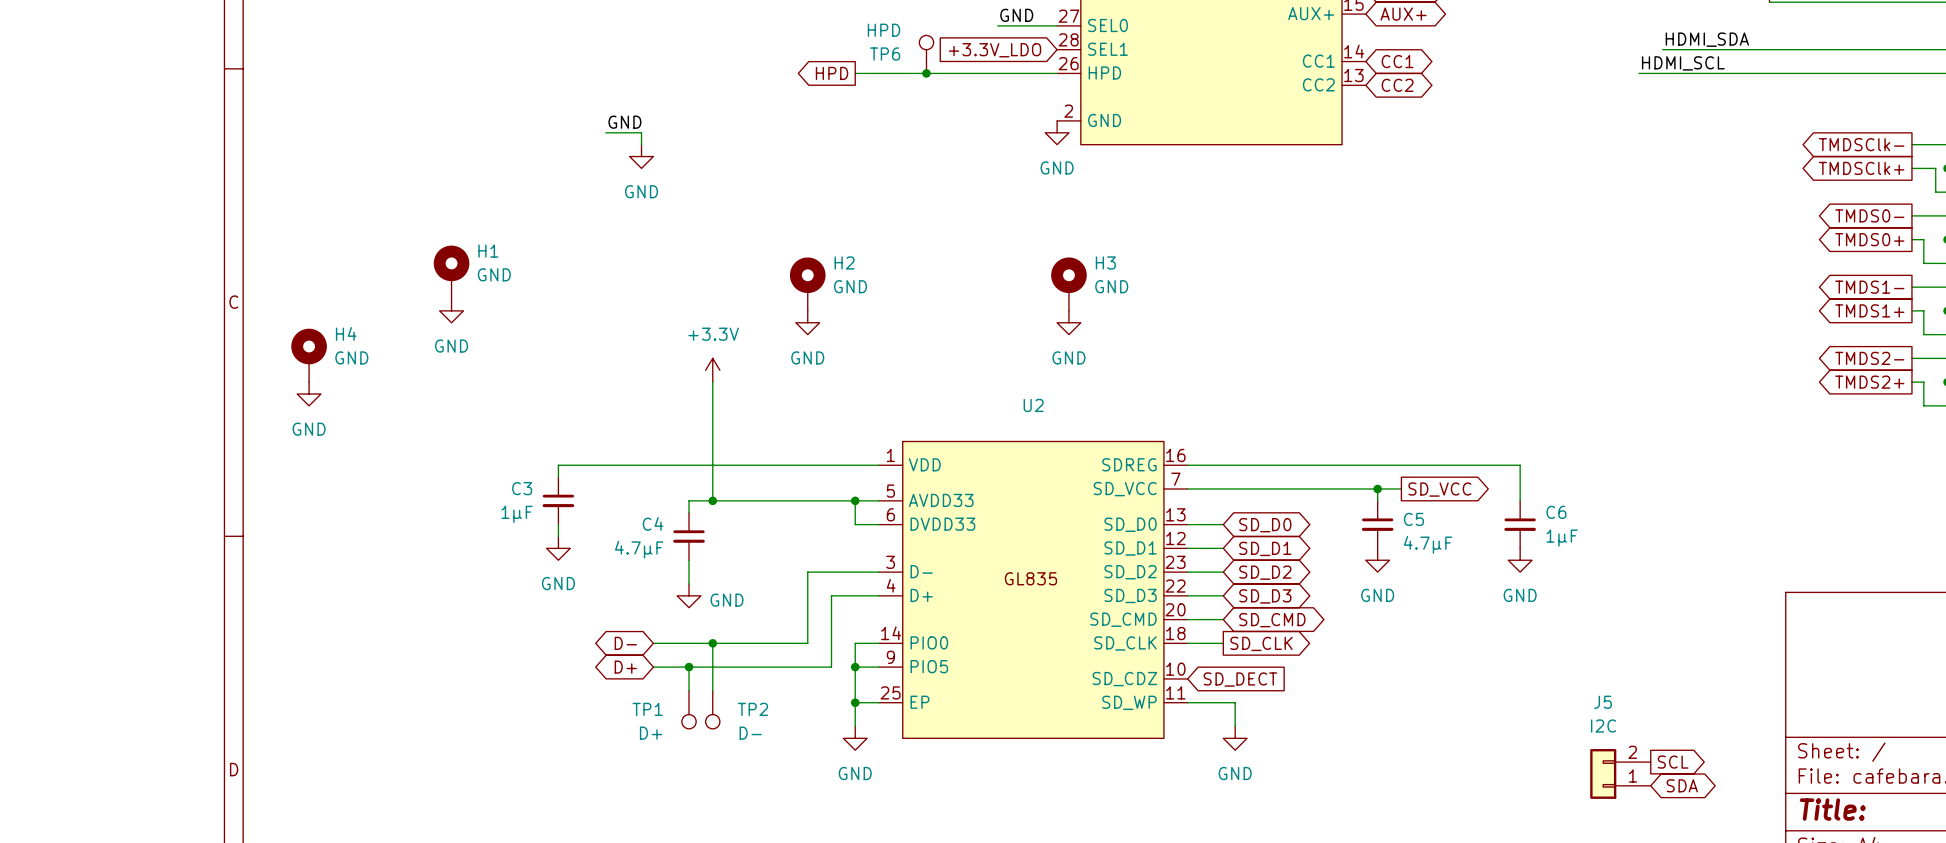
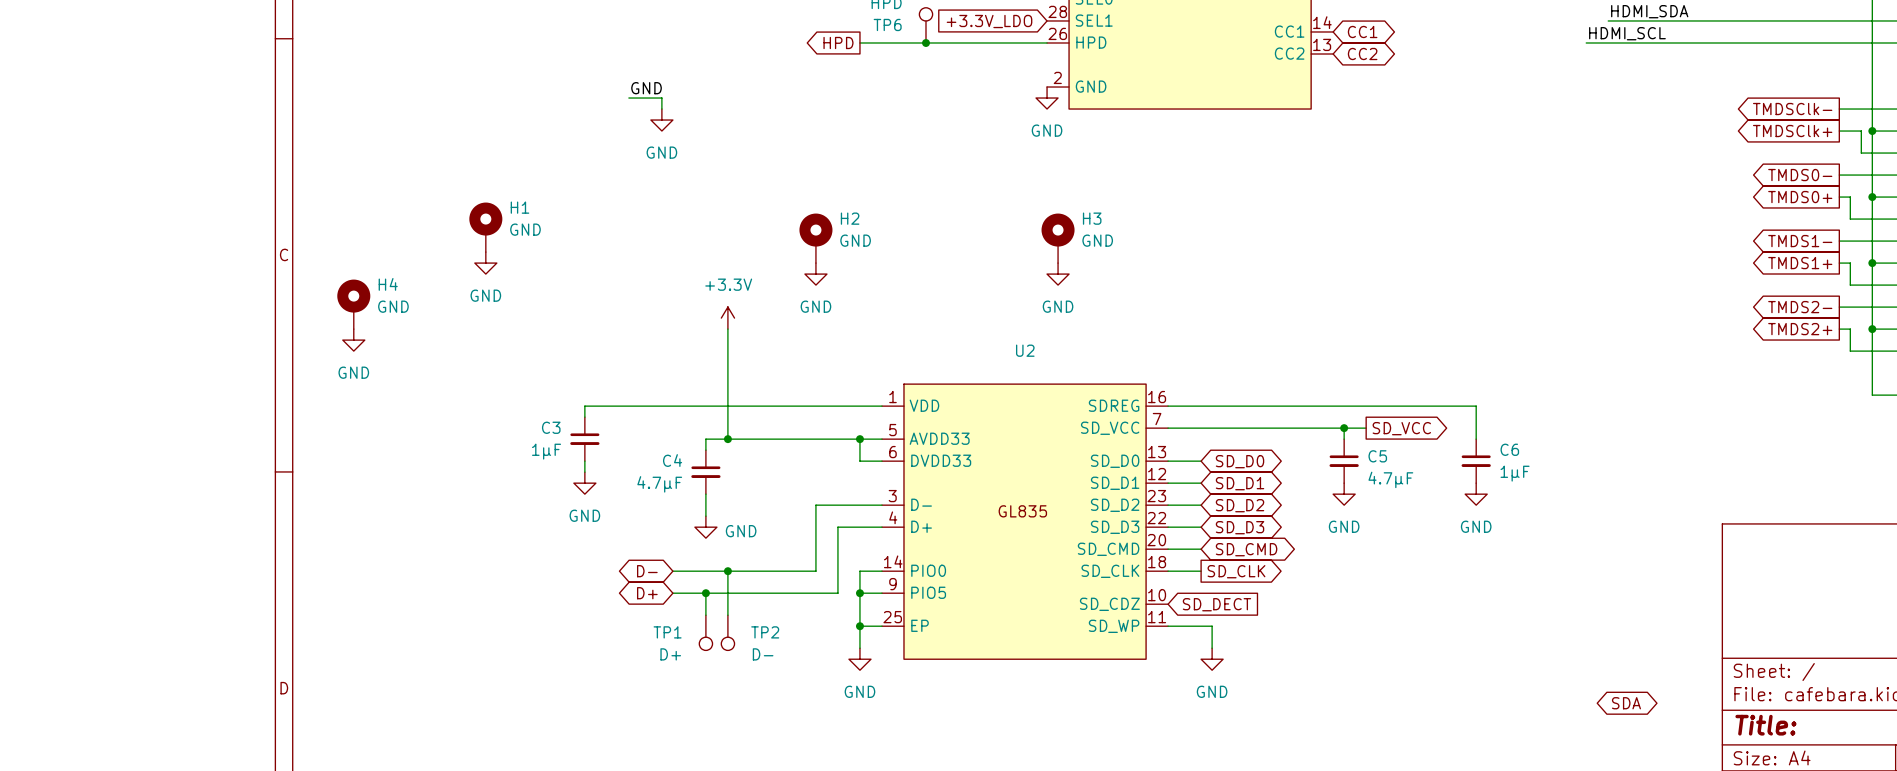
global label: SCL (1673, 762) -> none
J5: I2C (1620, 773) -> none

